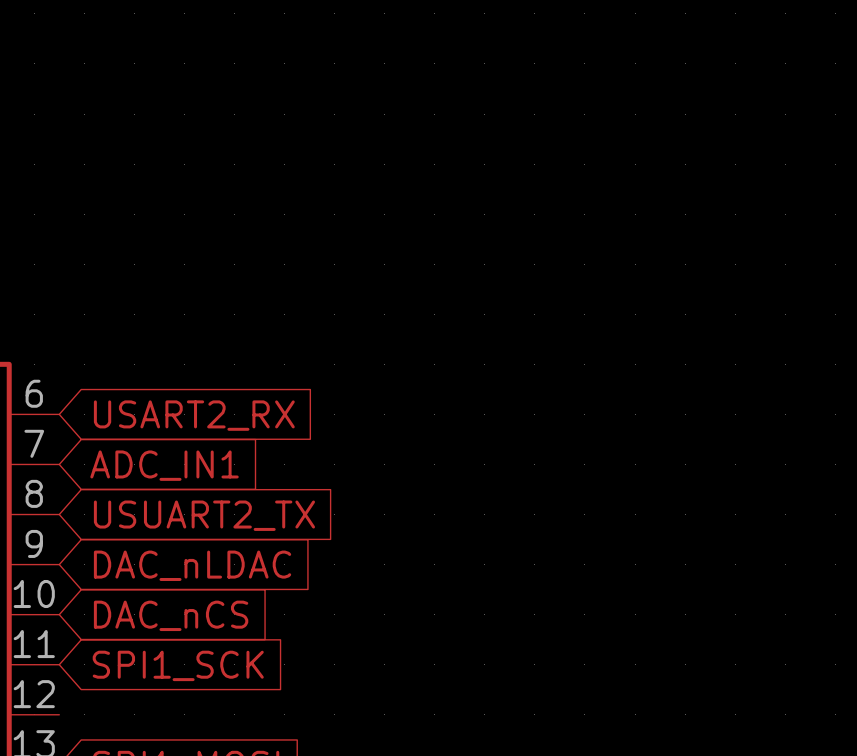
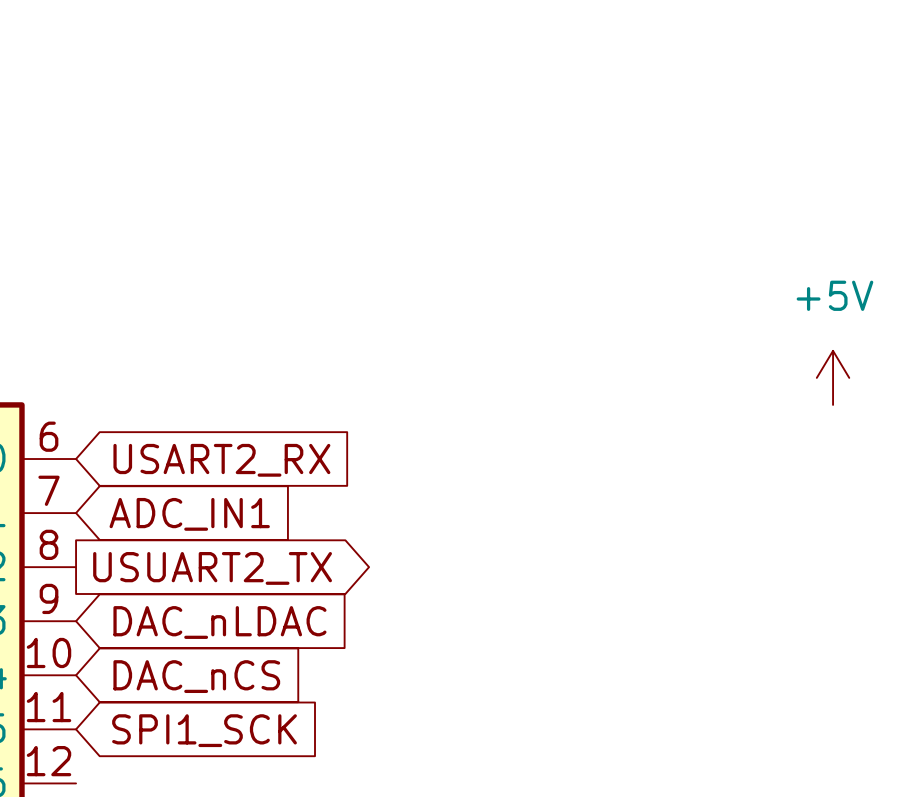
power symbol: none -> +5V (833, 377)
global label shape: input (204, 515) -> output (212, 568)

